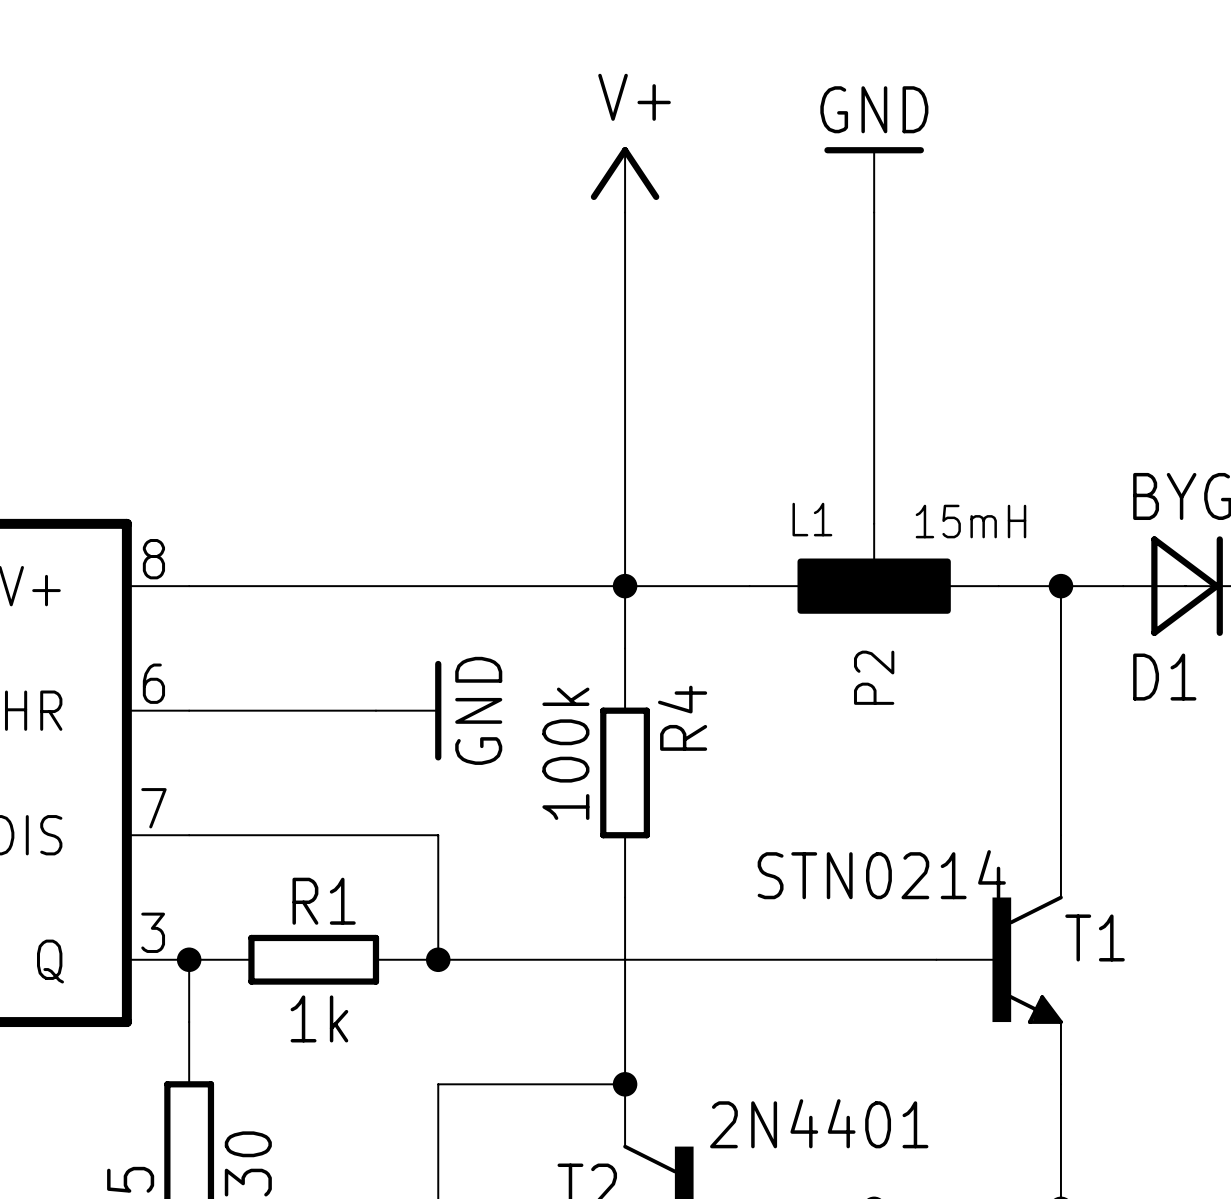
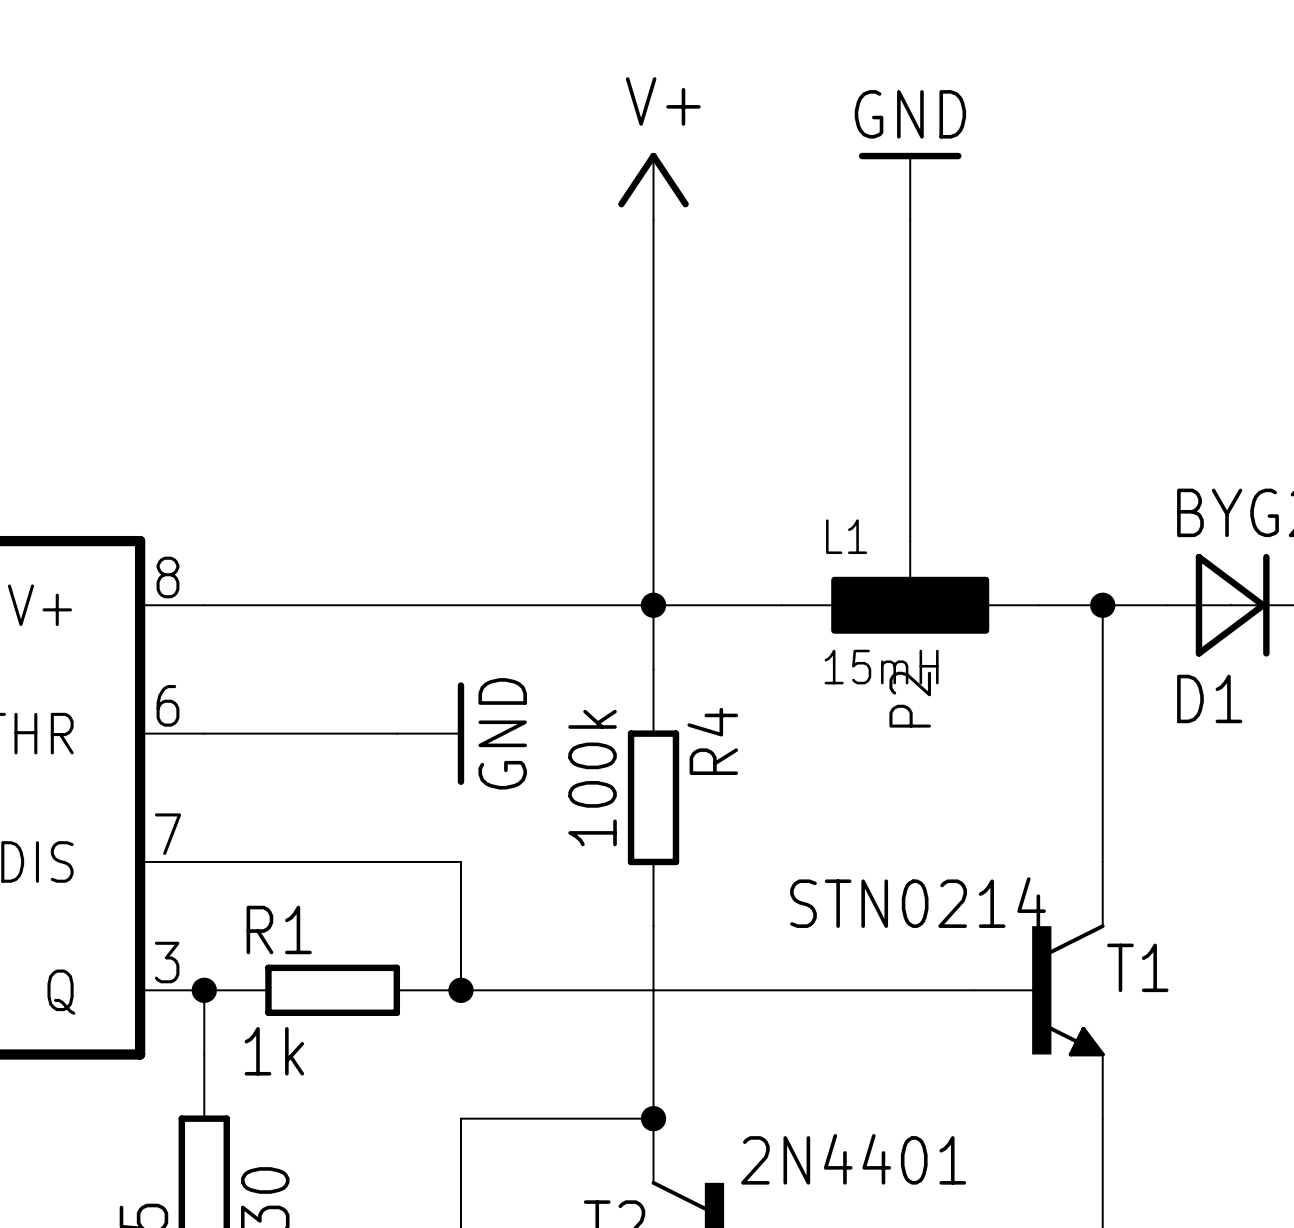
L1 value position: 15mH (970, 521) -> 15mH (881, 667)
R1 name position: R1 (324, 901) -> R1 (279, 929)
R1 value position: 1k (319, 1018) -> 1k (274, 1051)

